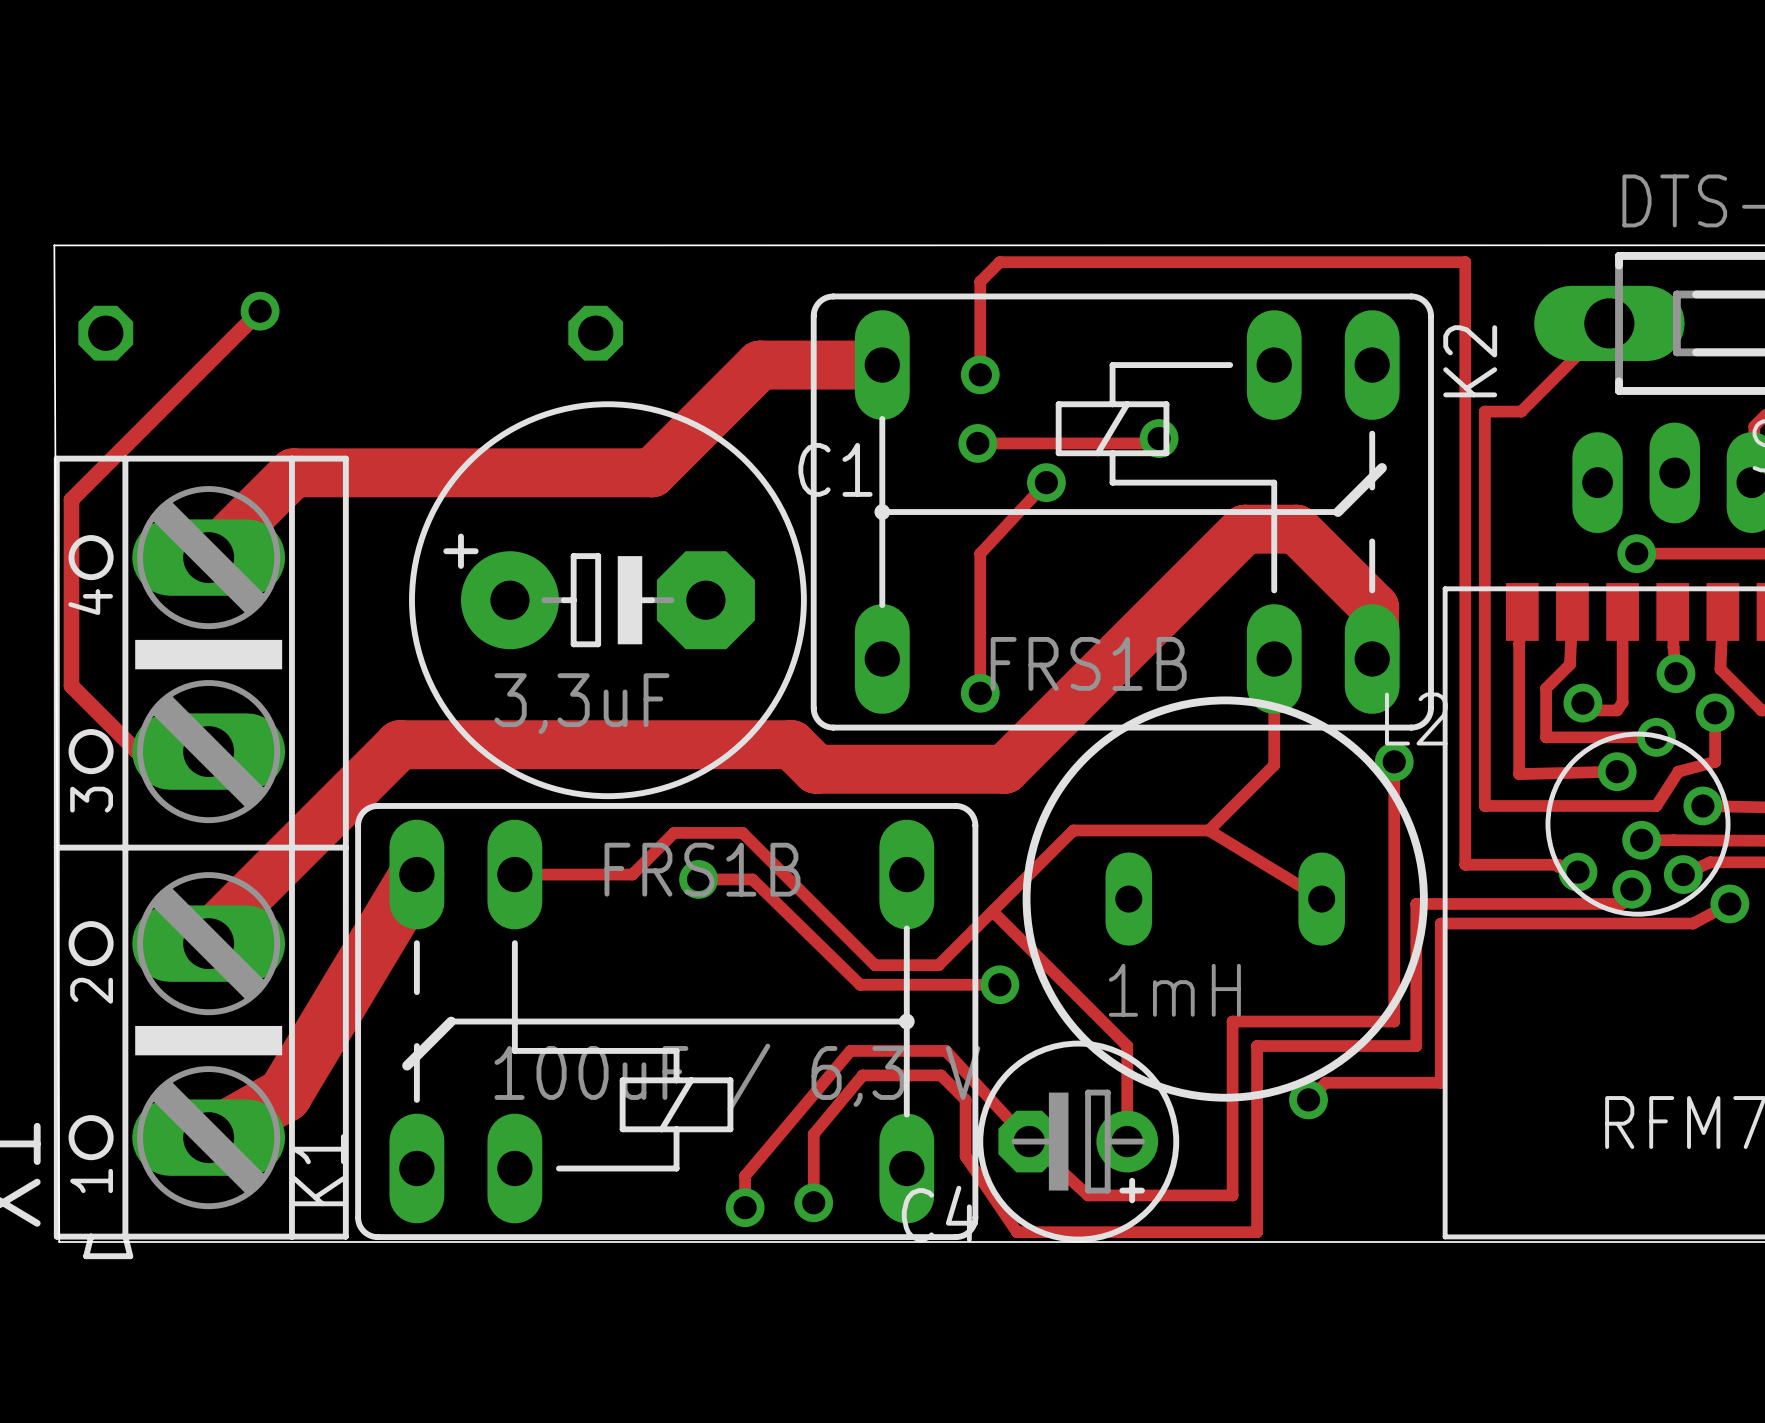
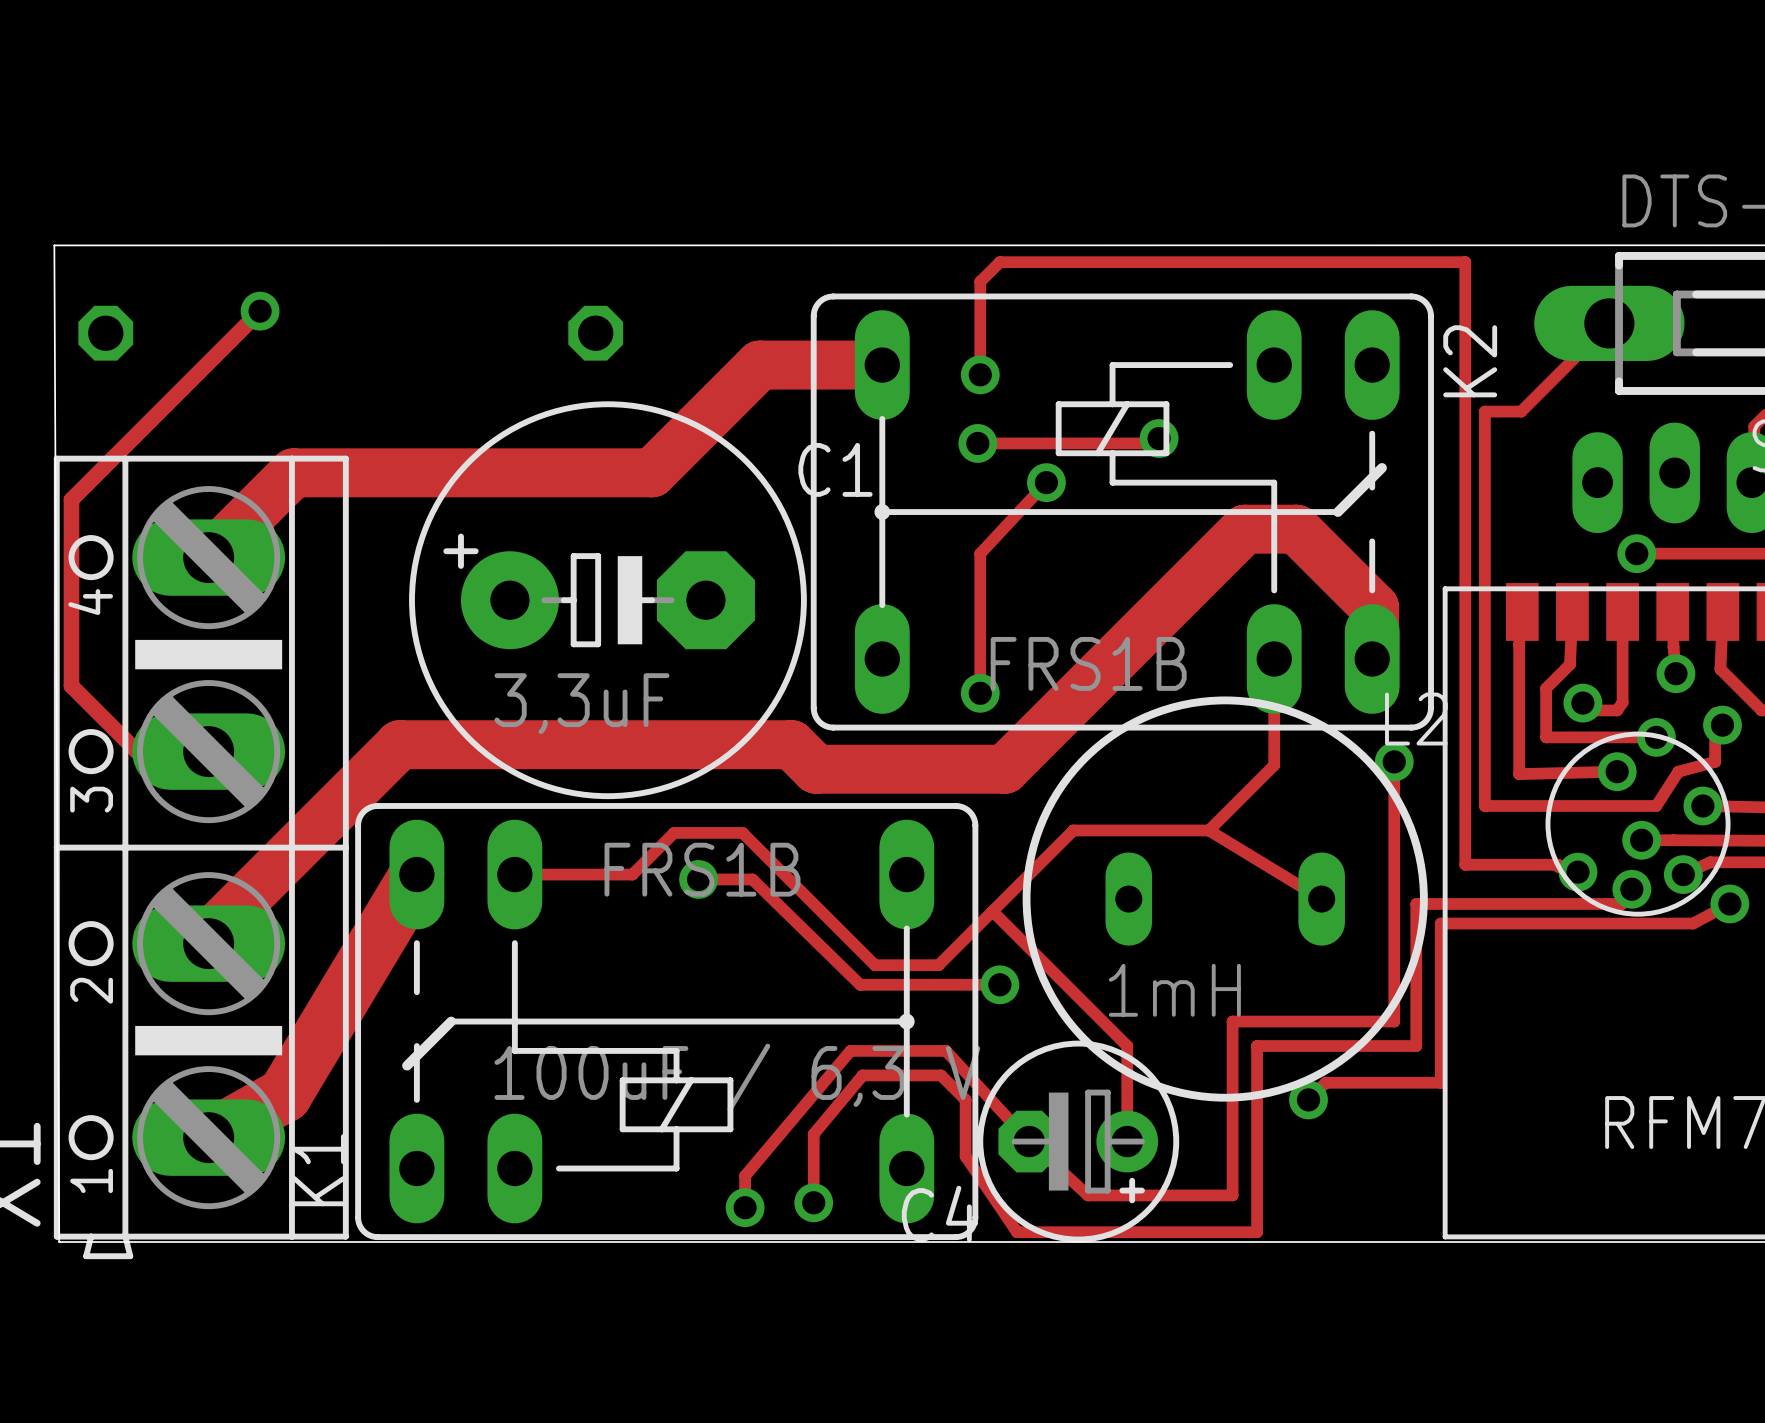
via position: (1715, 712) -> (1722, 725)

